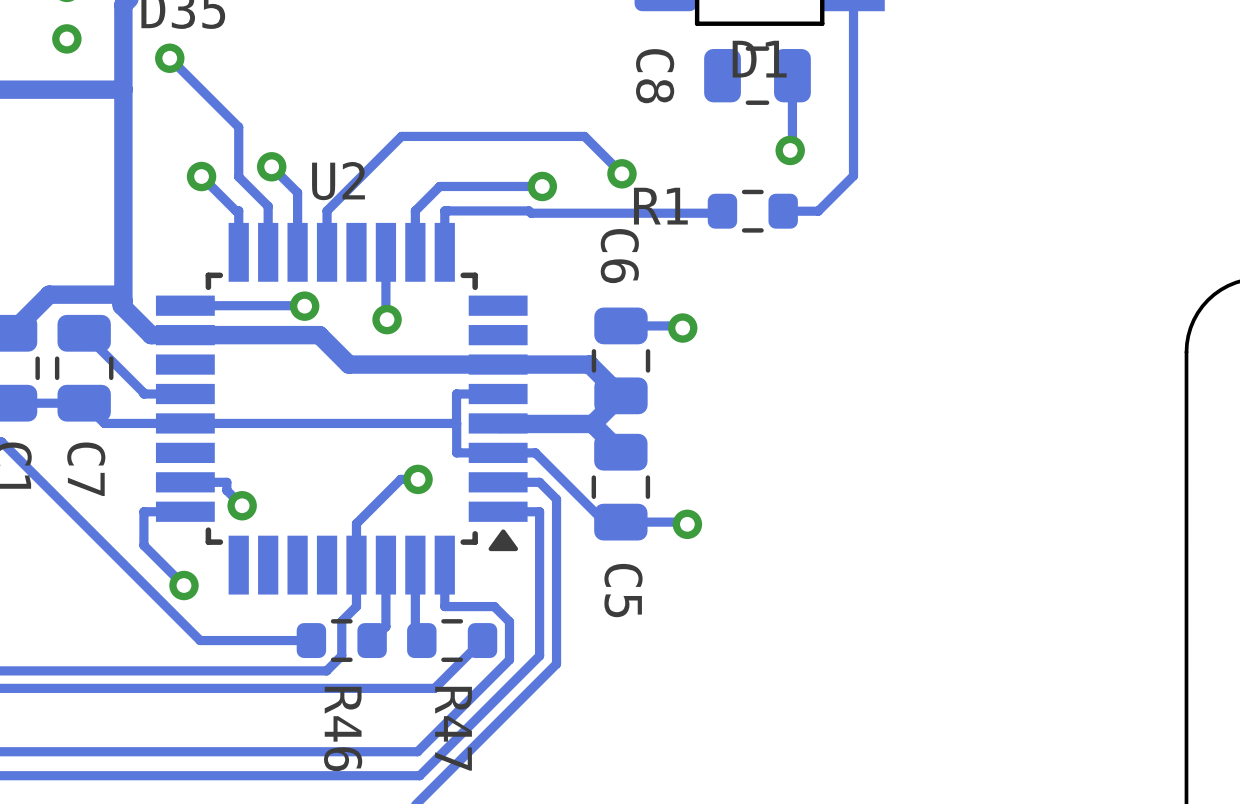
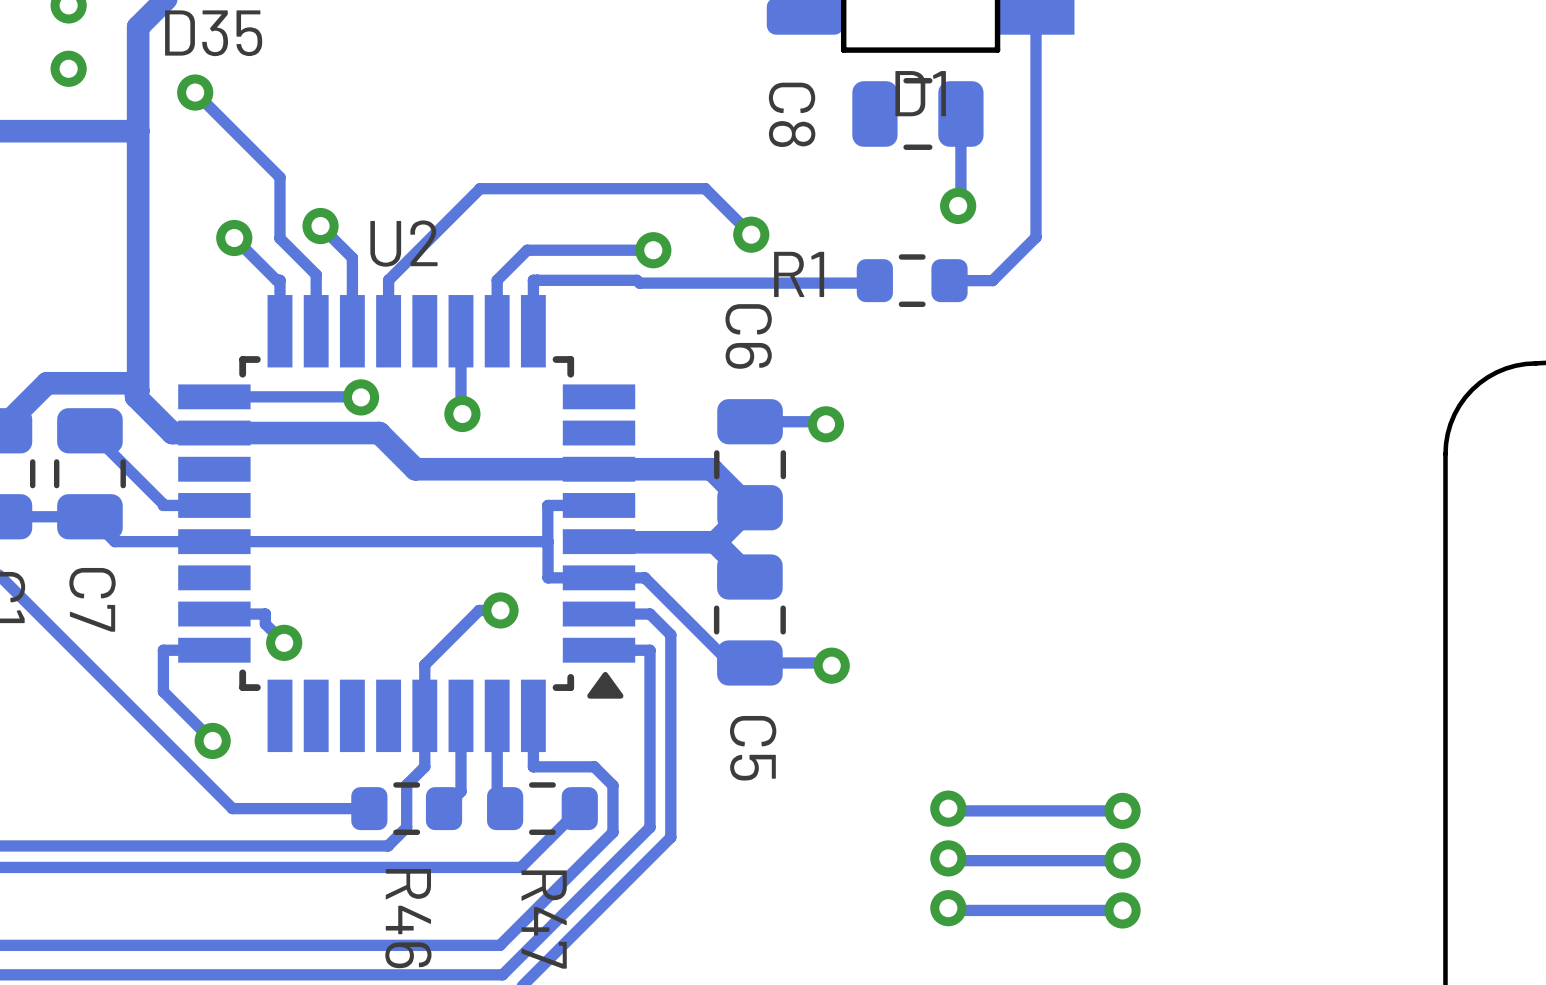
via: none -> (948, 808)
track: none -> (1122, 810) (950, 810)
via: none -> (1122, 810)
via: none -> (948, 858)
track: none -> (1122, 860) (950, 860)
via: none -> (1122, 860)
via: none -> (948, 908)
track: none -> (1122, 910) (950, 910)
via: none -> (1122, 910)

